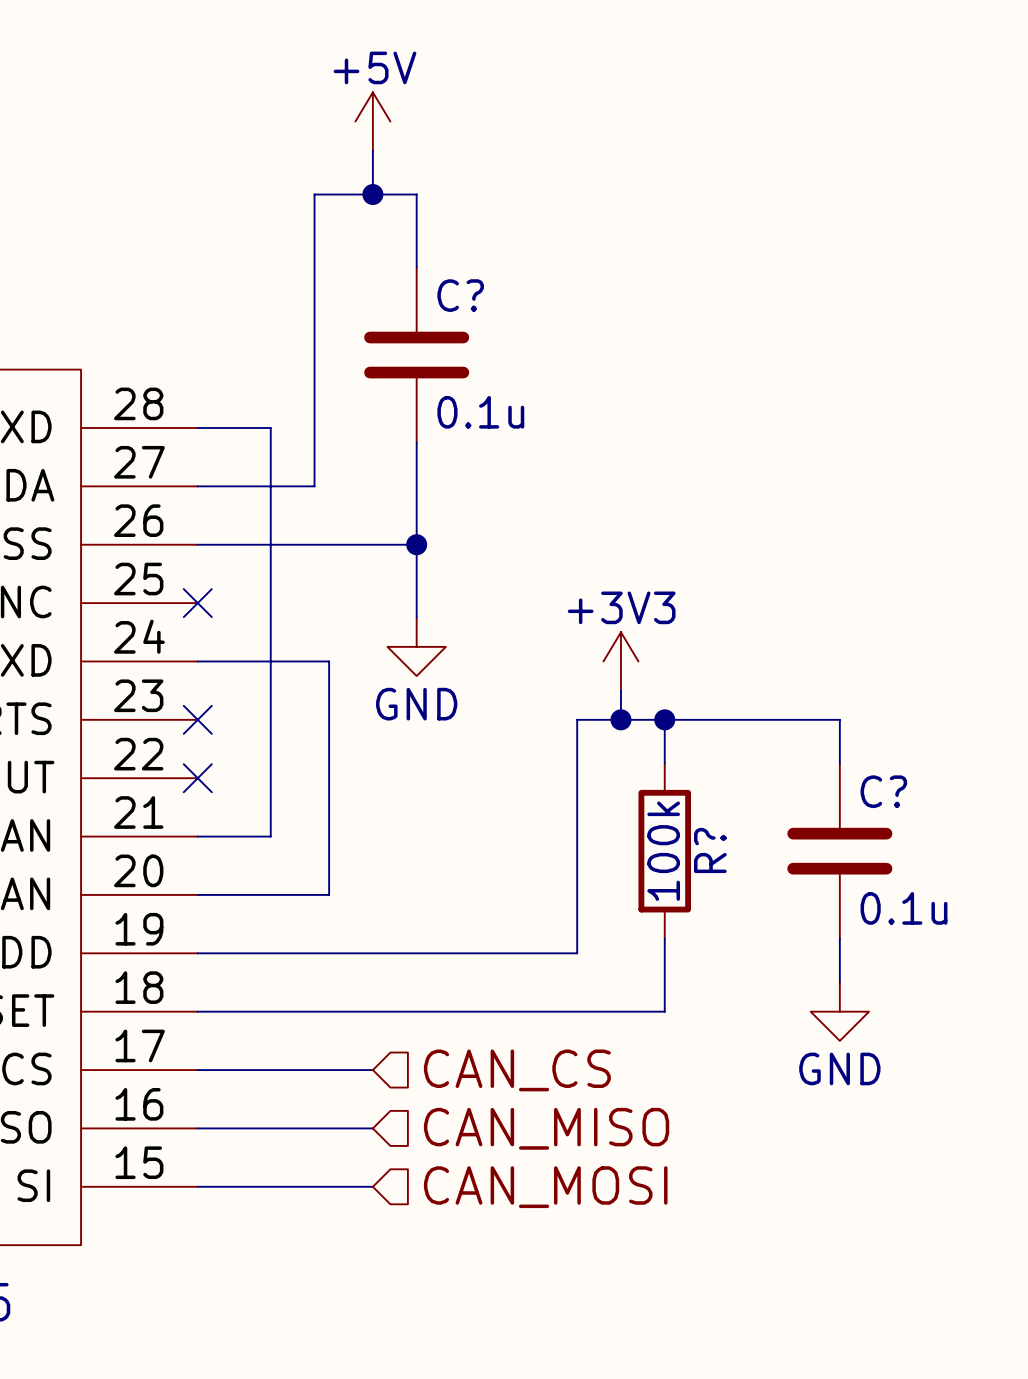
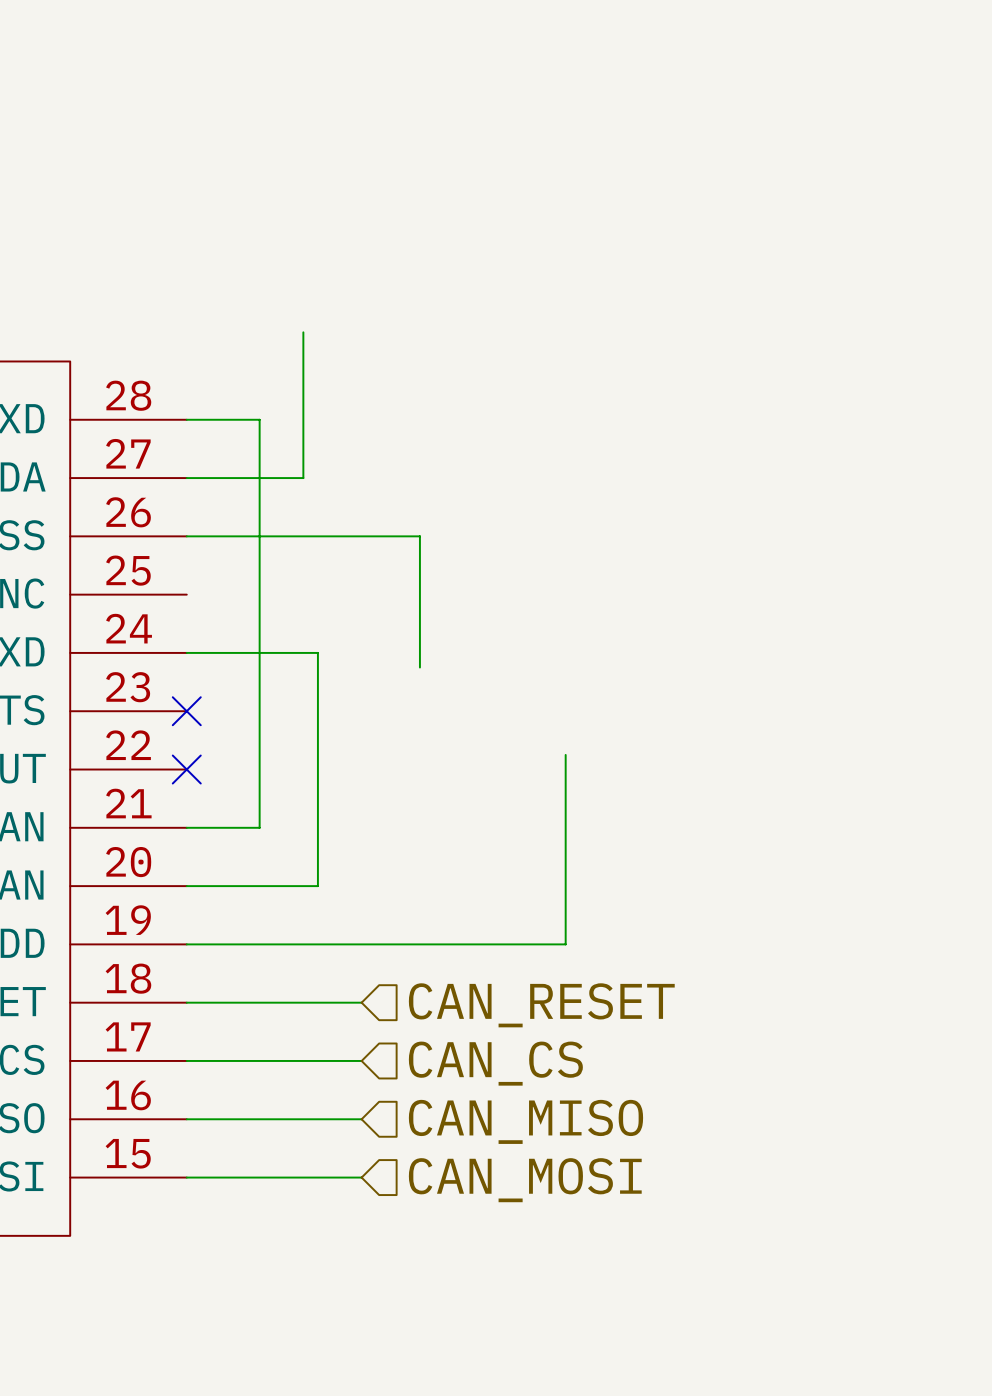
power symbol: +5V (372, 121) -> none
wire: (372, 150) (372, 194) -> none
junction: (372, 194) -> none
wire: (416, 267) (416, 194) (314, 194) (314, 340) -> none
C?: 0.1u (416, 355) -> none
wire: (416, 442) (416, 617) -> none
wire: none -> (405, 536) (419, 536) (419, 667)
junction: (416, 544) -> none
no-connect mark: (197, 603) -> none
power symbol: GND (416, 646) -> none
power symbol: +3V3 (620, 661) -> none
wire: (620, 690) (620, 719) -> none
junction: (620, 719) -> none
wire: (664, 719) (664, 763) -> none
junction: (664, 719) -> none
wire: (577, 763) (577, 719) (839, 719) (839, 763) -> none
R?: 100k (664, 851) -> none
C?: 0.1u (839, 851) -> none
wire: (664, 938) (664, 1011) (372, 1011) -> none
wire: (839, 938) (839, 982) -> none
power symbol: GND (839, 1011) -> none
hierarchical label: none -> CAN_RESET (541, 1005)

